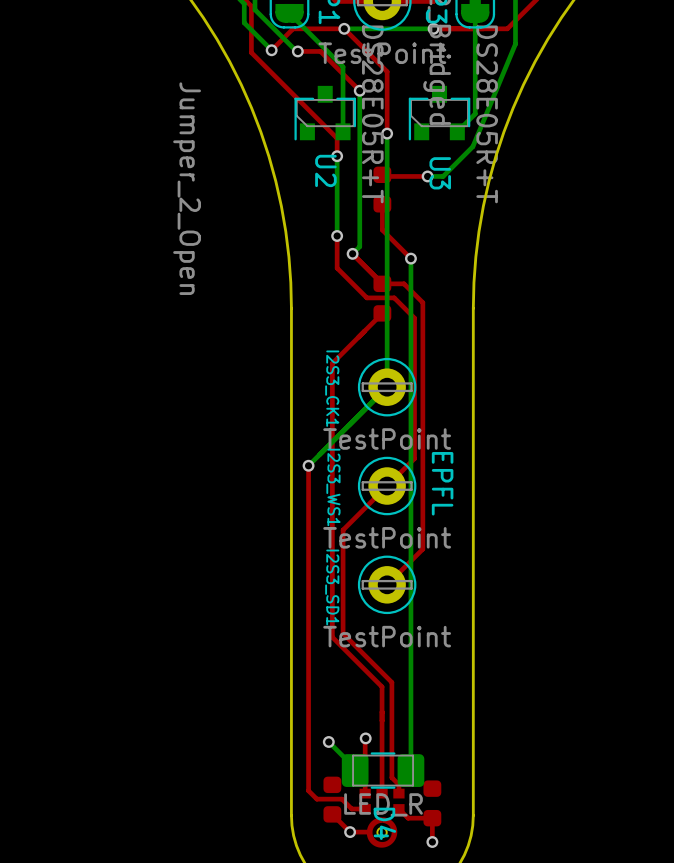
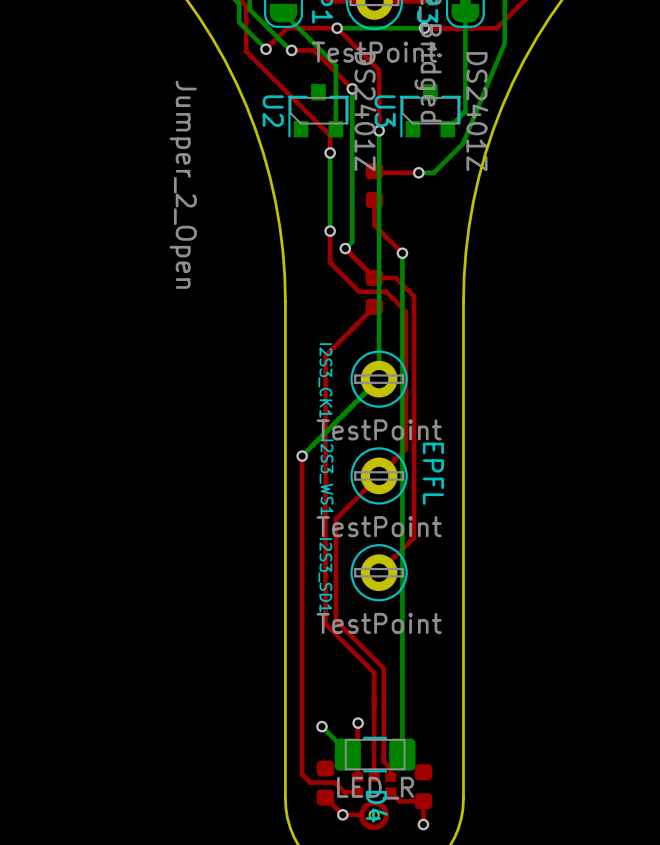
U2 value: DS28E05R+T (372, 114) -> DS2401Z (365, 111)
U3 value: DS28E05R+T (487, 114) -> DS2401Z (477, 111)
U2 name position: U2 (325, 170) -> U2 (273, 111)
U3 name position: U3 (440, 173) -> U3 (385, 111)

